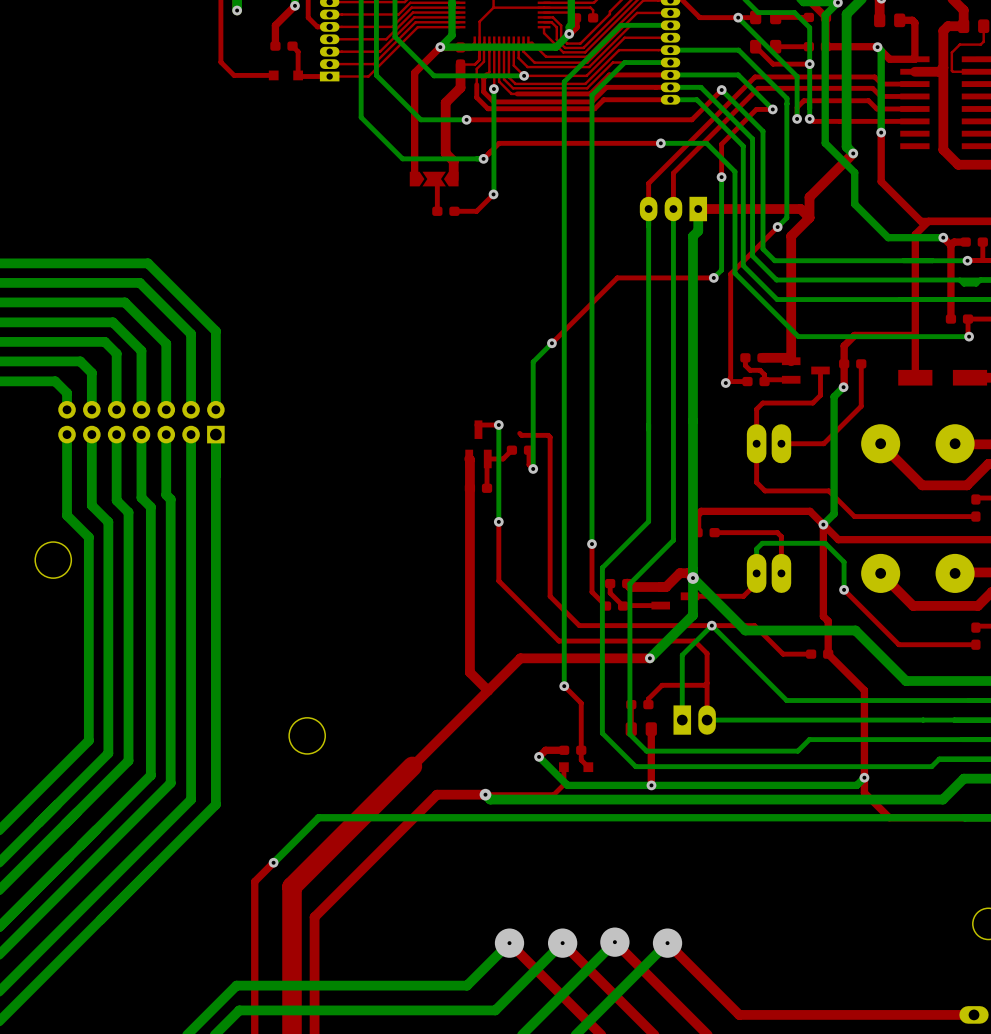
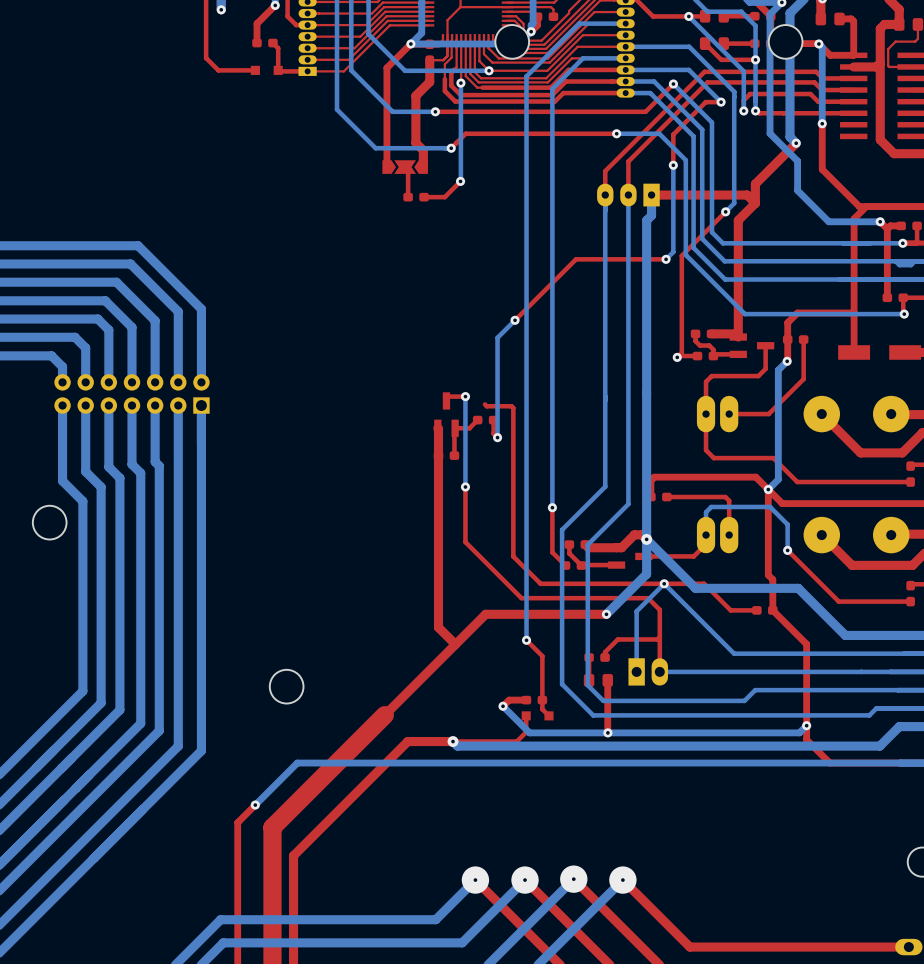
part: none -> (512, 41)
part: none -> (785, 41)

